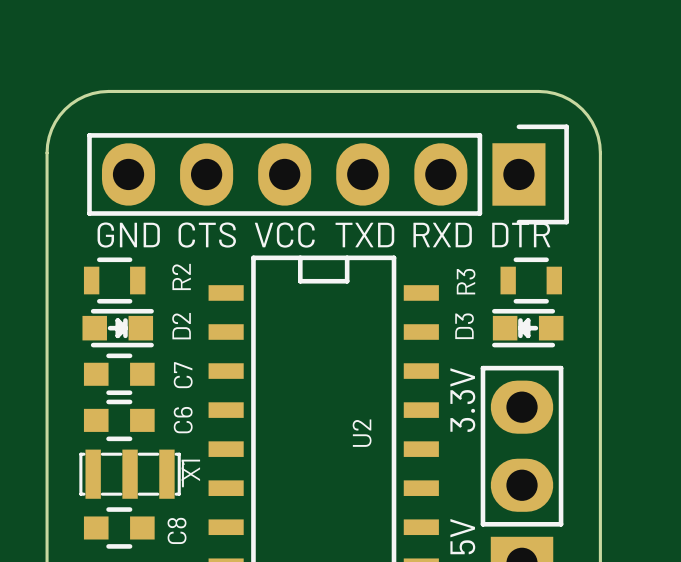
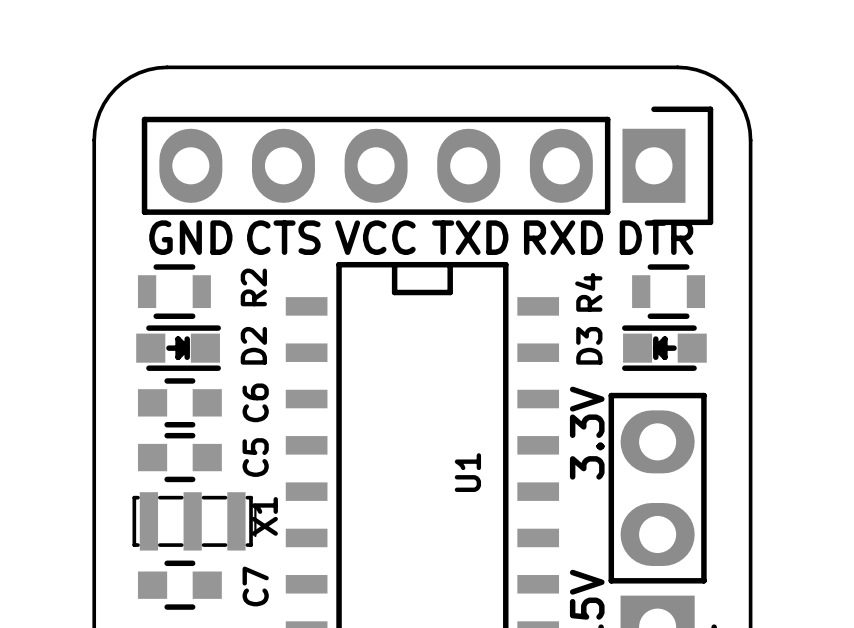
R3 name: R3 (466, 281) -> R4 (588, 292)
C7 name: C7 (183, 375) -> C6 (255, 402)
C6 name: C6 (183, 420) -> C5 (255, 457)
U2 name: U2 (362, 433) -> U1 (467, 472)
C8 name: C8 (177, 530) -> C7 (255, 586)

